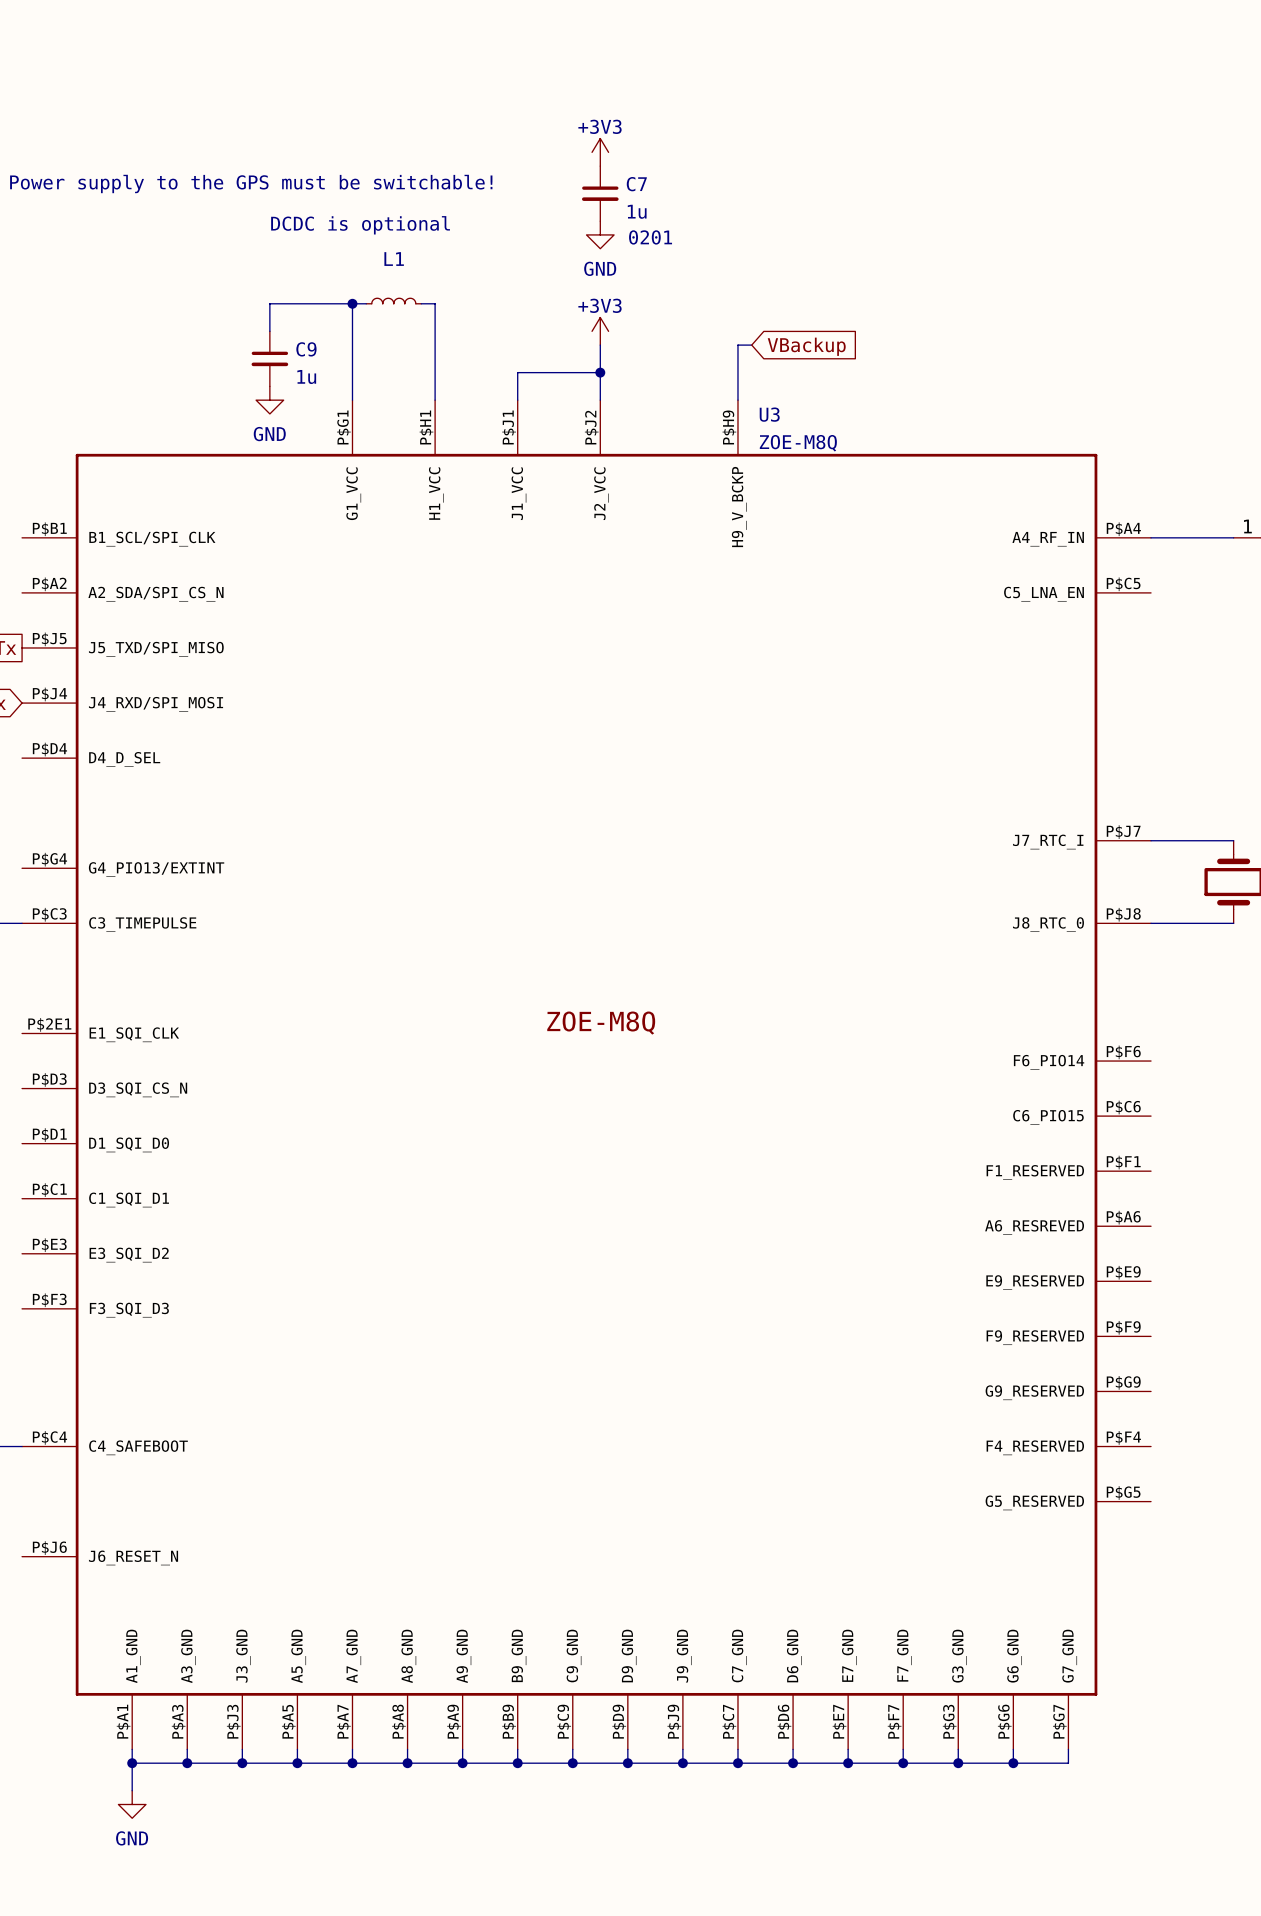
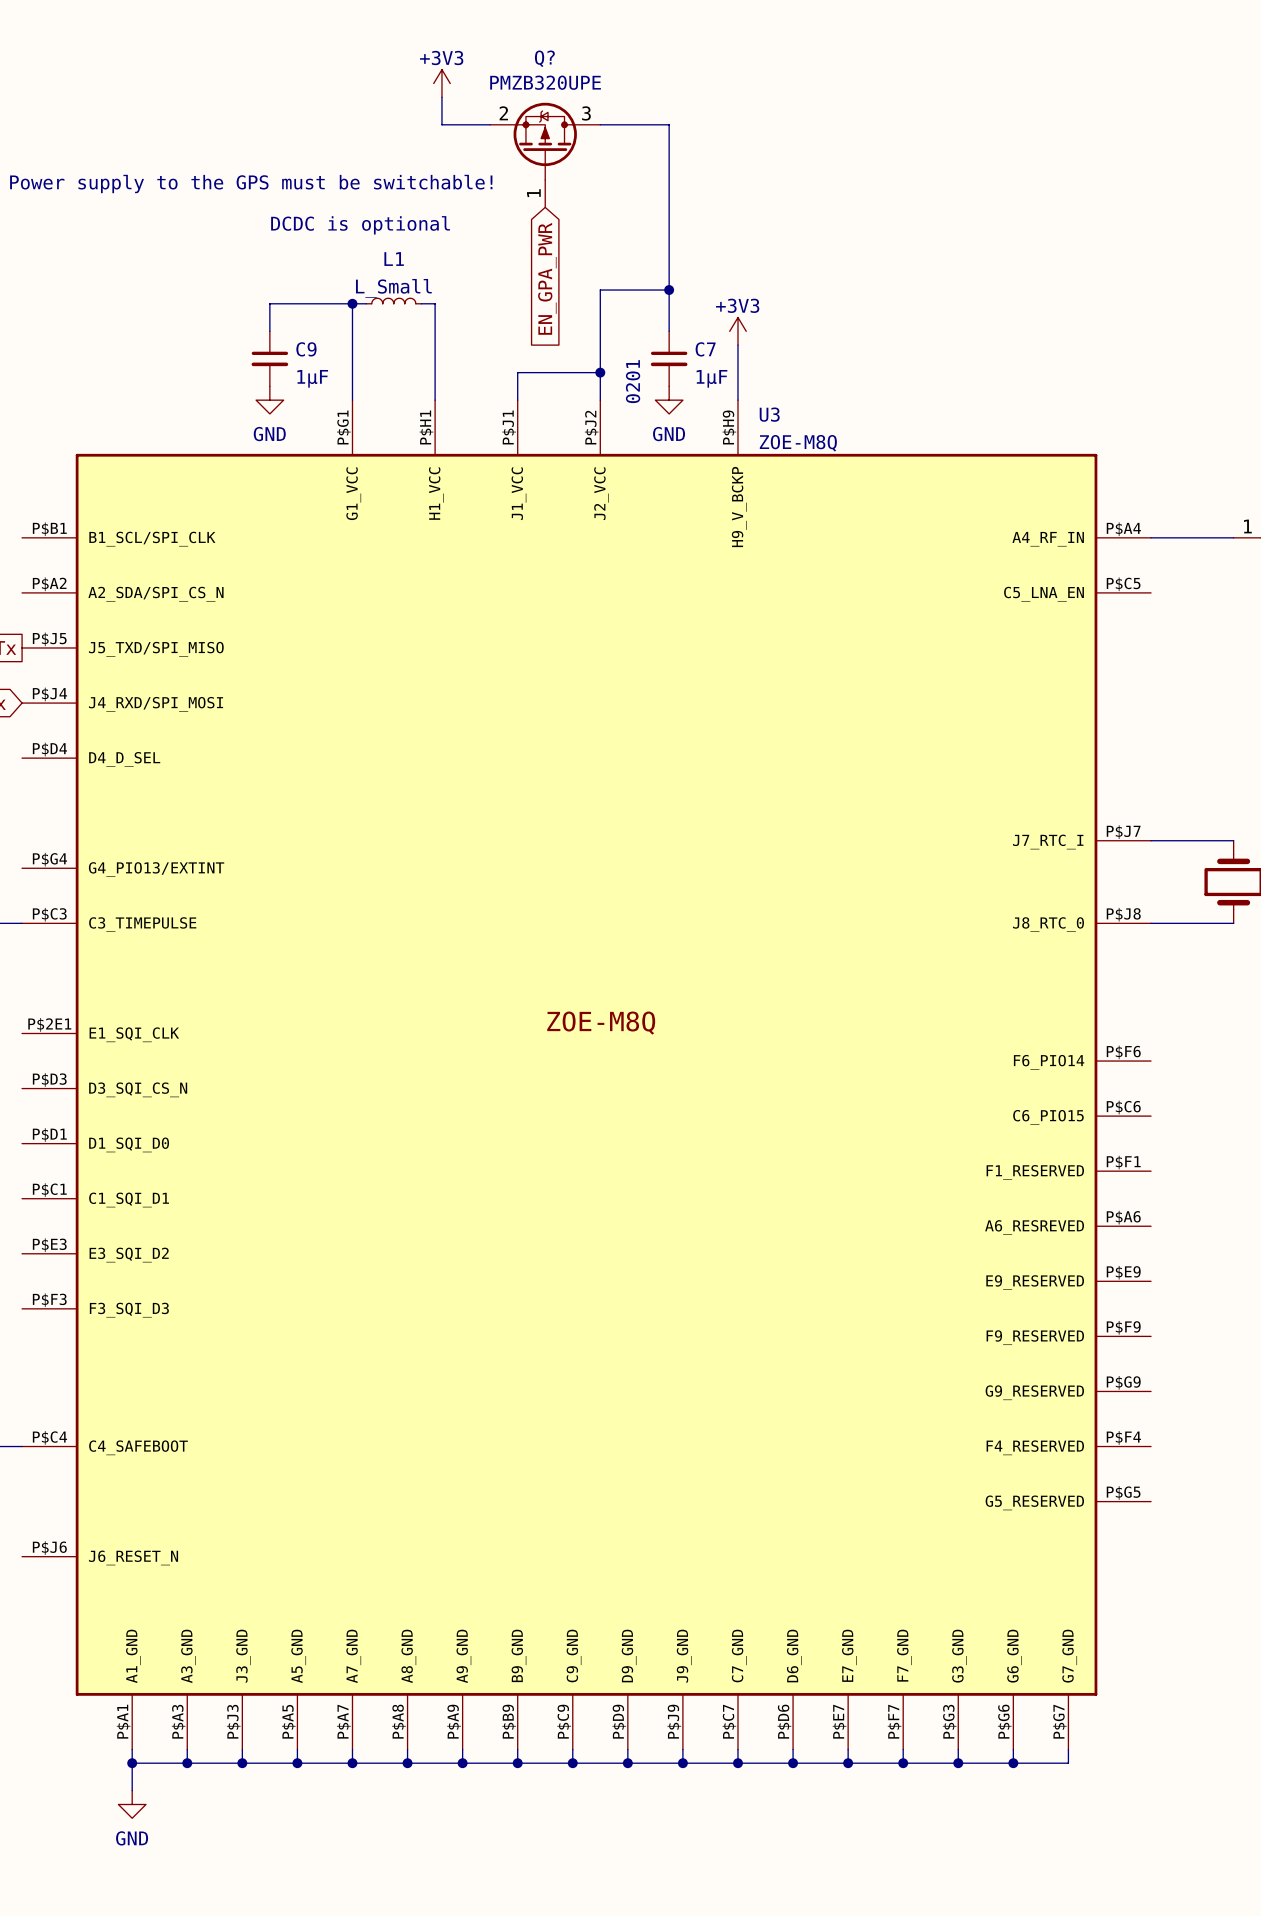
power symbol: none -> +3V3 (441, 83)
wire: none -> (441, 97) (441, 124) (490, 124)
wire: none -> (600, 124) (669, 124) (669, 331)
power symbol: +3V3 (600, 152) -> none
Q?: none -> PMZB320UPE (545, 155)
C7 position: (600, 193) -> (669, 358)
C7 value: 1u (637, 211) -> 1µF (711, 378)
power symbol position: GND (600, 234) -> GND (669, 400)
text rotation: 0° (650, 237) -> 90° counterclockwise (633, 381)
text position: 0201 (650, 237) -> 0201 (633, 381)
global label: none -> EN_GPA_PWR (547, 278)
L1 value: none -> L_Small (393, 288)
wire: none -> (669, 290) (600, 290) (600, 345)
junction: none -> (669, 290)
power symbol: +3V3 (600, 331) -> none
power symbol: none -> +3V3 (737, 331)
wire: (737, 345) (751, 345) -> none
global label: VBackup (806, 346) -> none
C9 value: 1u (306, 377) -> 1µF (312, 378)
U3 symbol: [22, 400, 1152, 1750] -> [22, 400, 1152, 1750]

